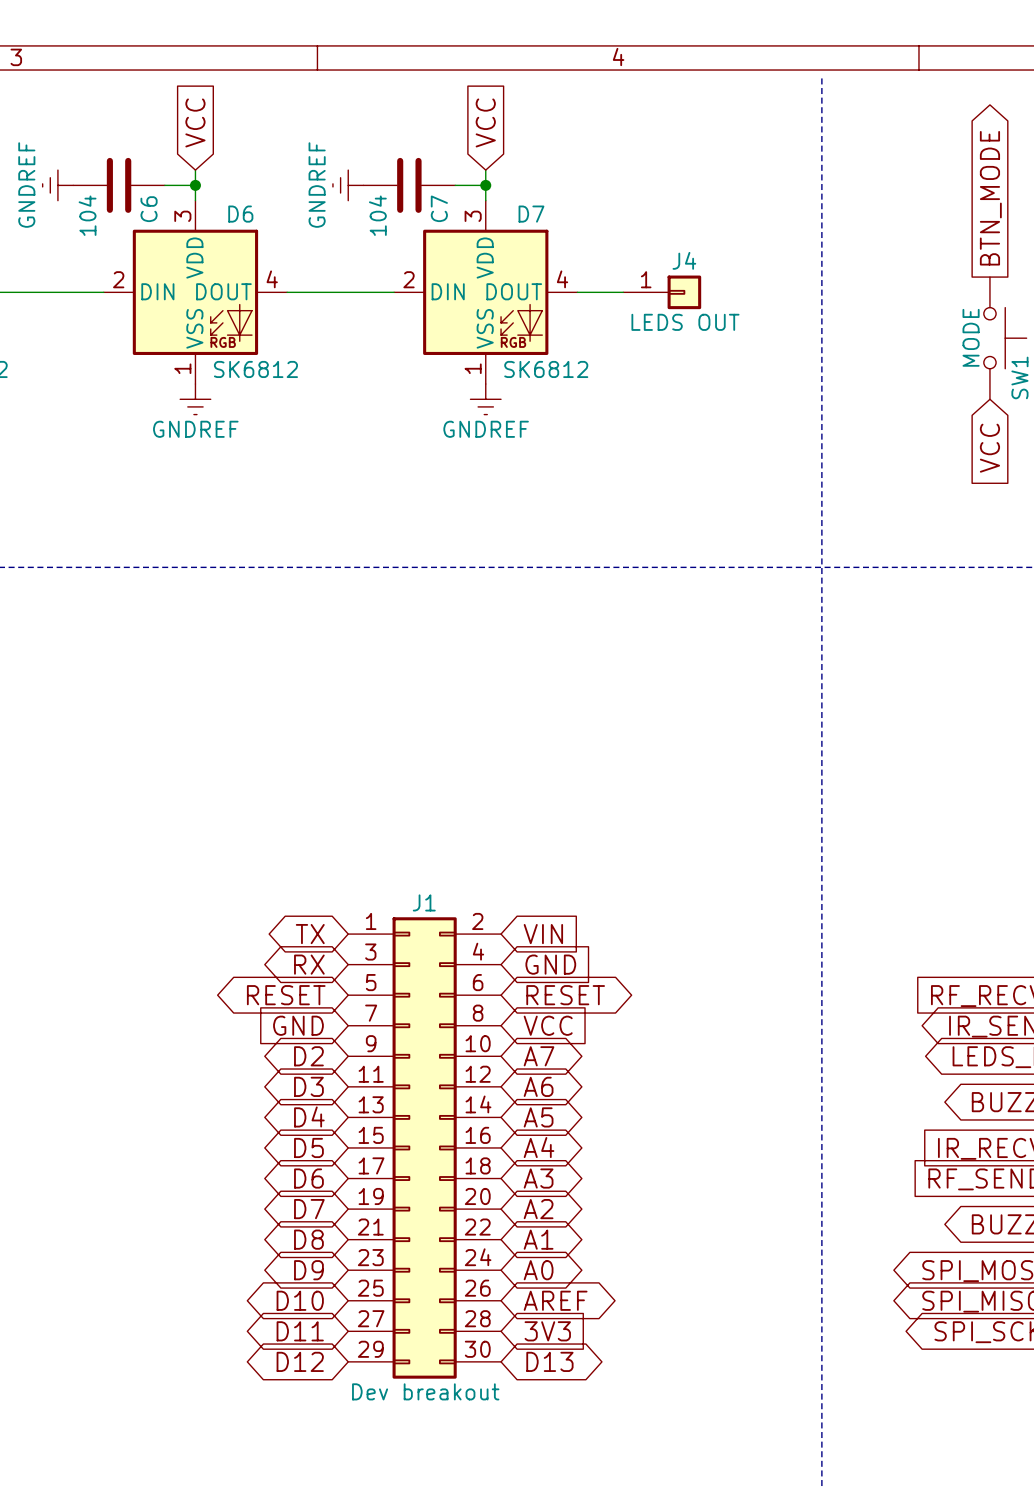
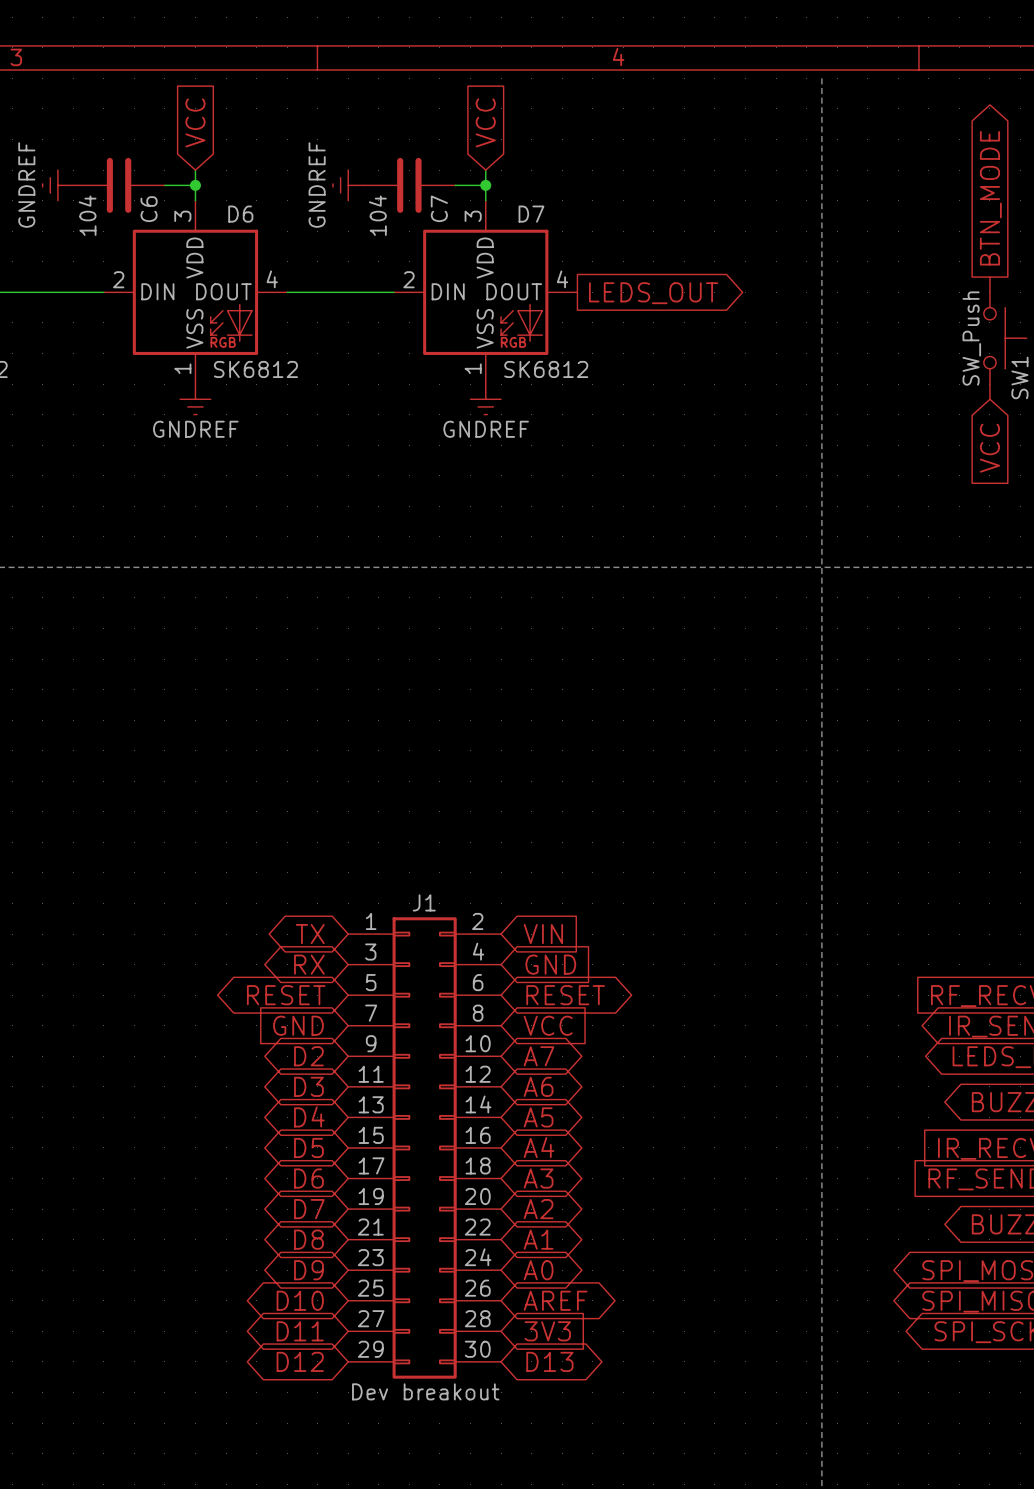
wire: (577, 292) (623, 292) -> none
J4: LEDS OUT (662, 292) -> none
global label: none -> LEDS_OUT (653, 293)
SW1 value: MODE (971, 337) -> SW_Push (971, 338)

